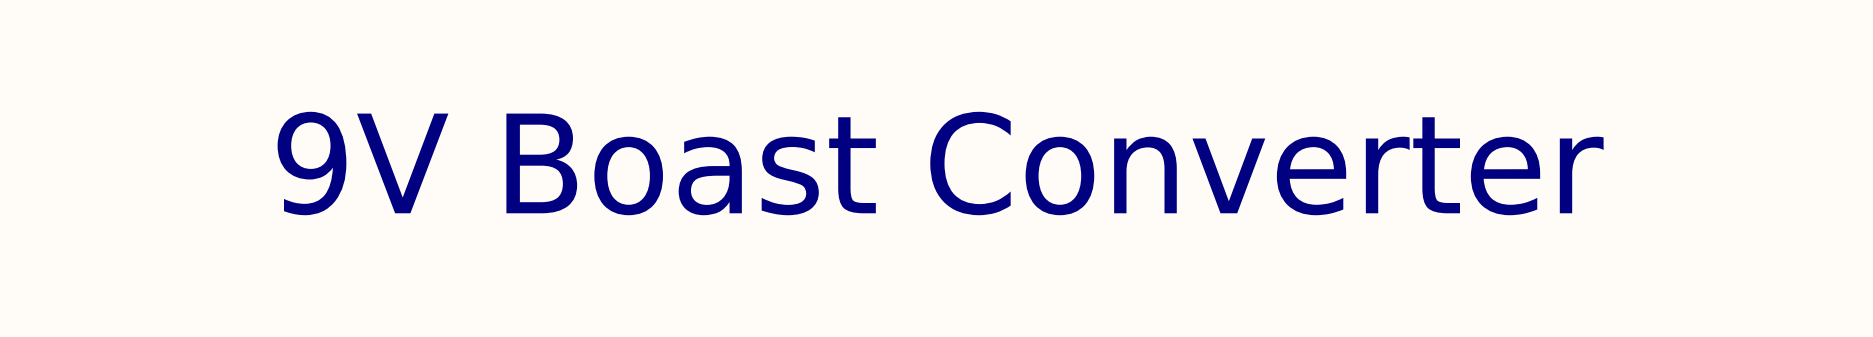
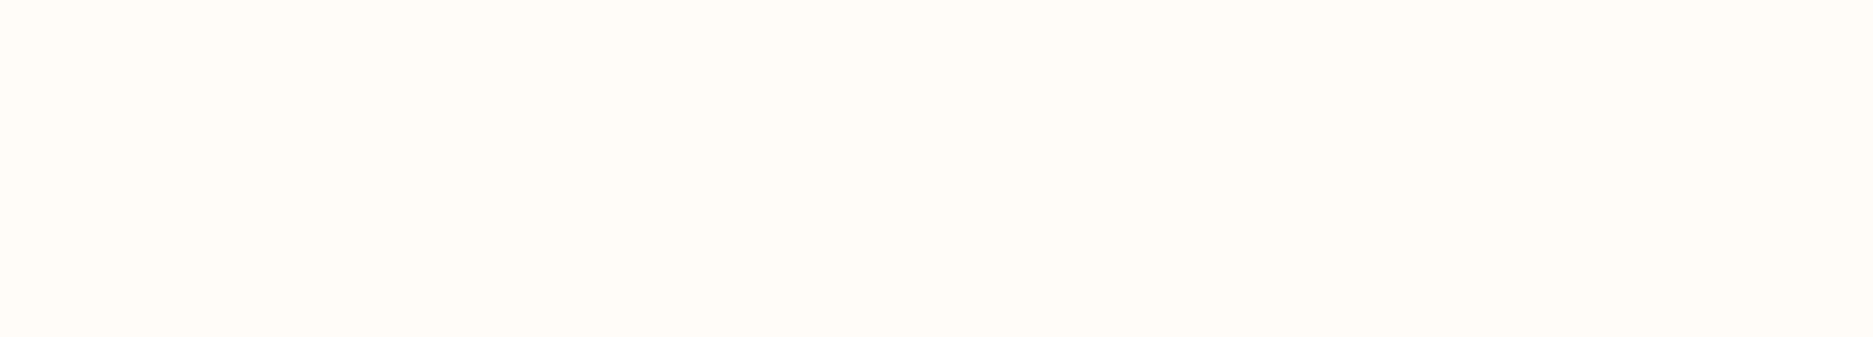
text: 9V Boast Converter (940, 163) -> none

